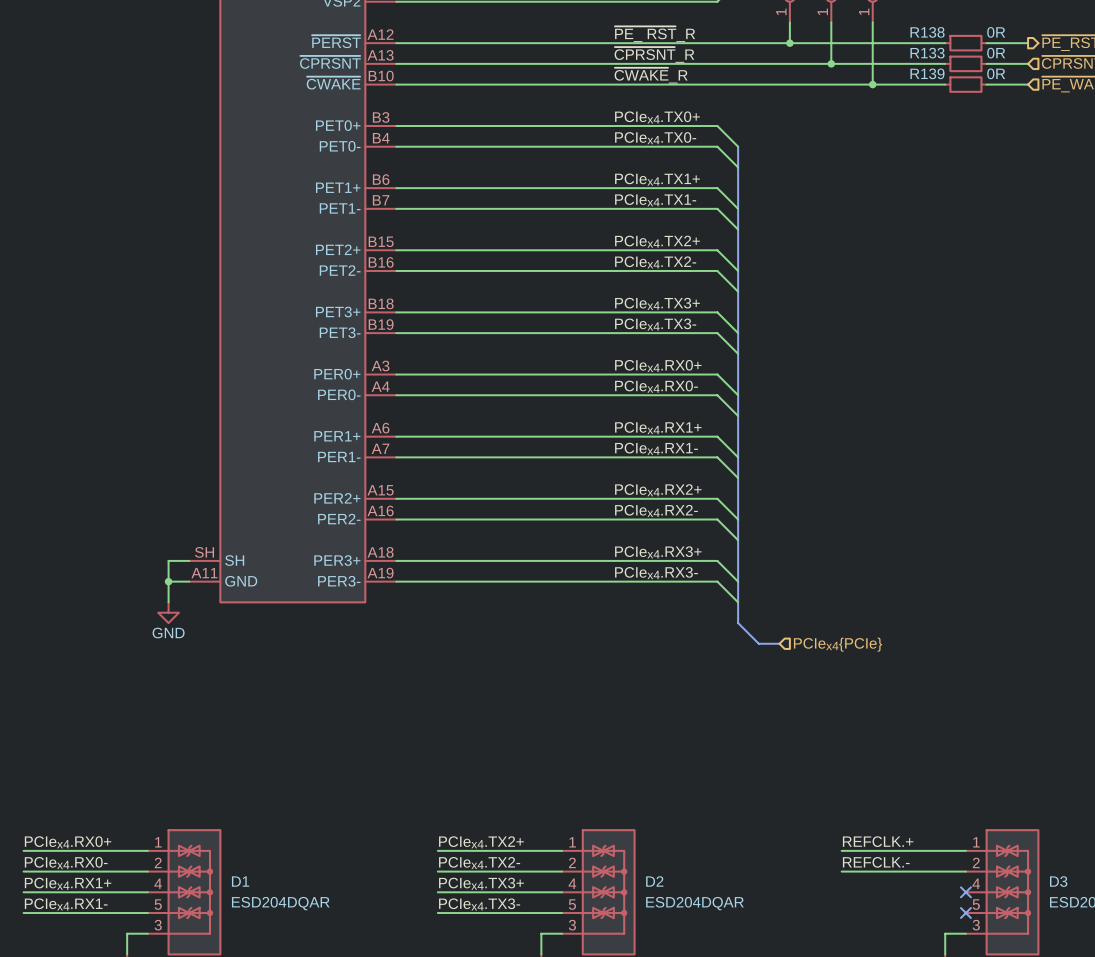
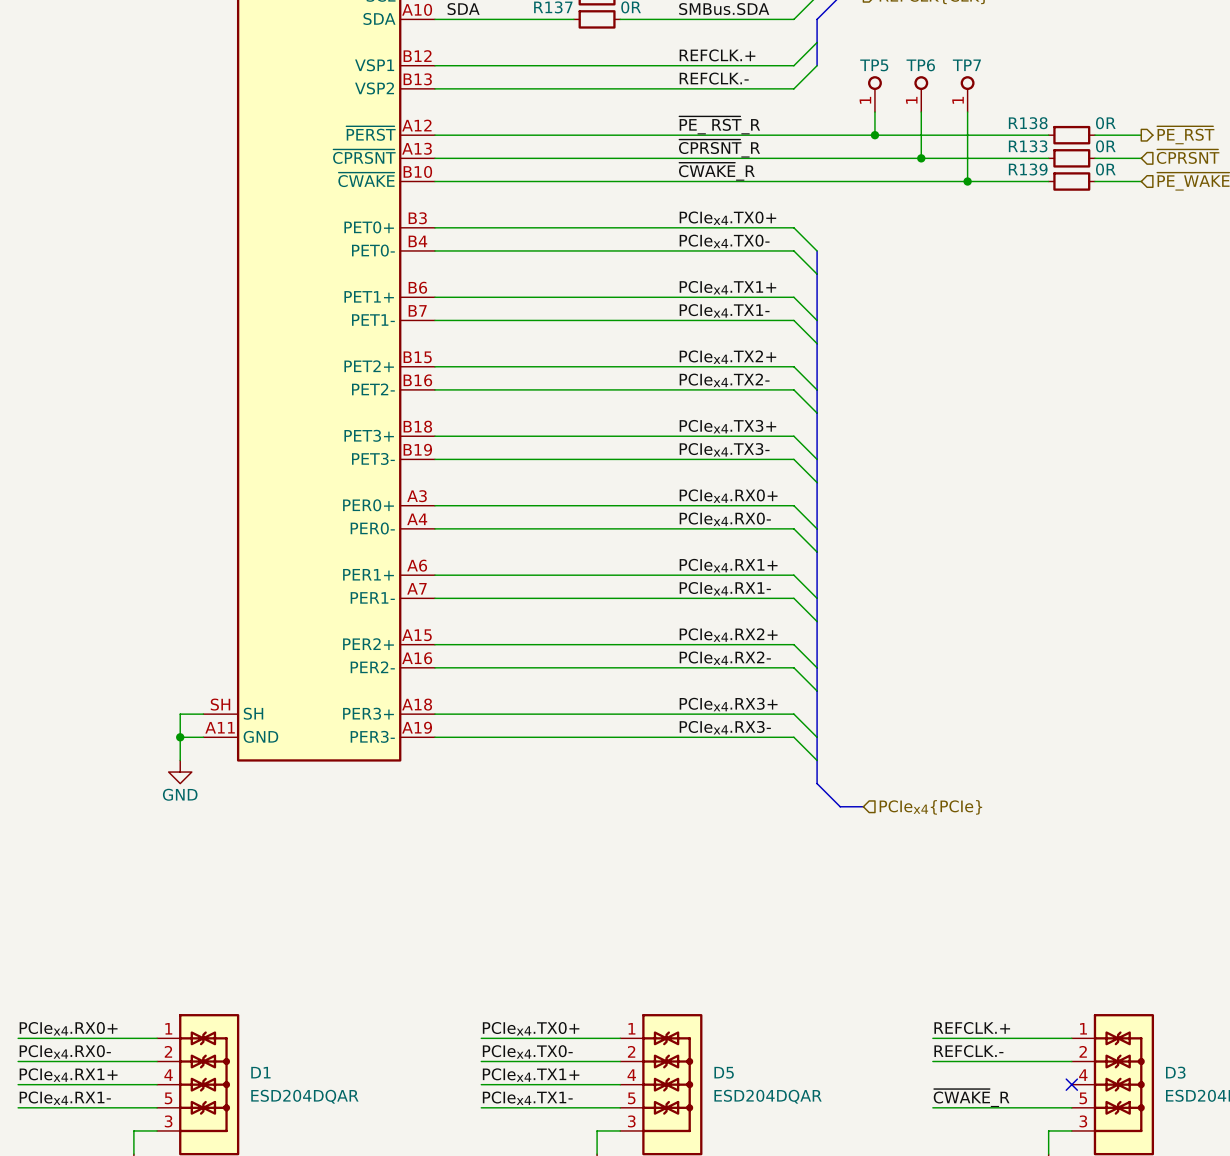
label: PCIex4.TX2+ (481, 842) -> PCIex4.TX0+ (531, 1028)
label: PCIex4.TX2- (479, 863) -> PCIex4.TX0- (527, 1051)
D2 name: D2 (654, 881) -> D5 (724, 1072)
label: PCIex4.TX3+ (481, 883) -> PCIex4.TX1+ (531, 1075)
label: PCIex4.TX3- (479, 904) -> PCIex4.TX1- (527, 1098)
label: none -> ~{CWAKE}_R (971, 1098)
wire: none -> (932, 1107) (1071, 1107)
no-connect mark: (965, 913) -> none

